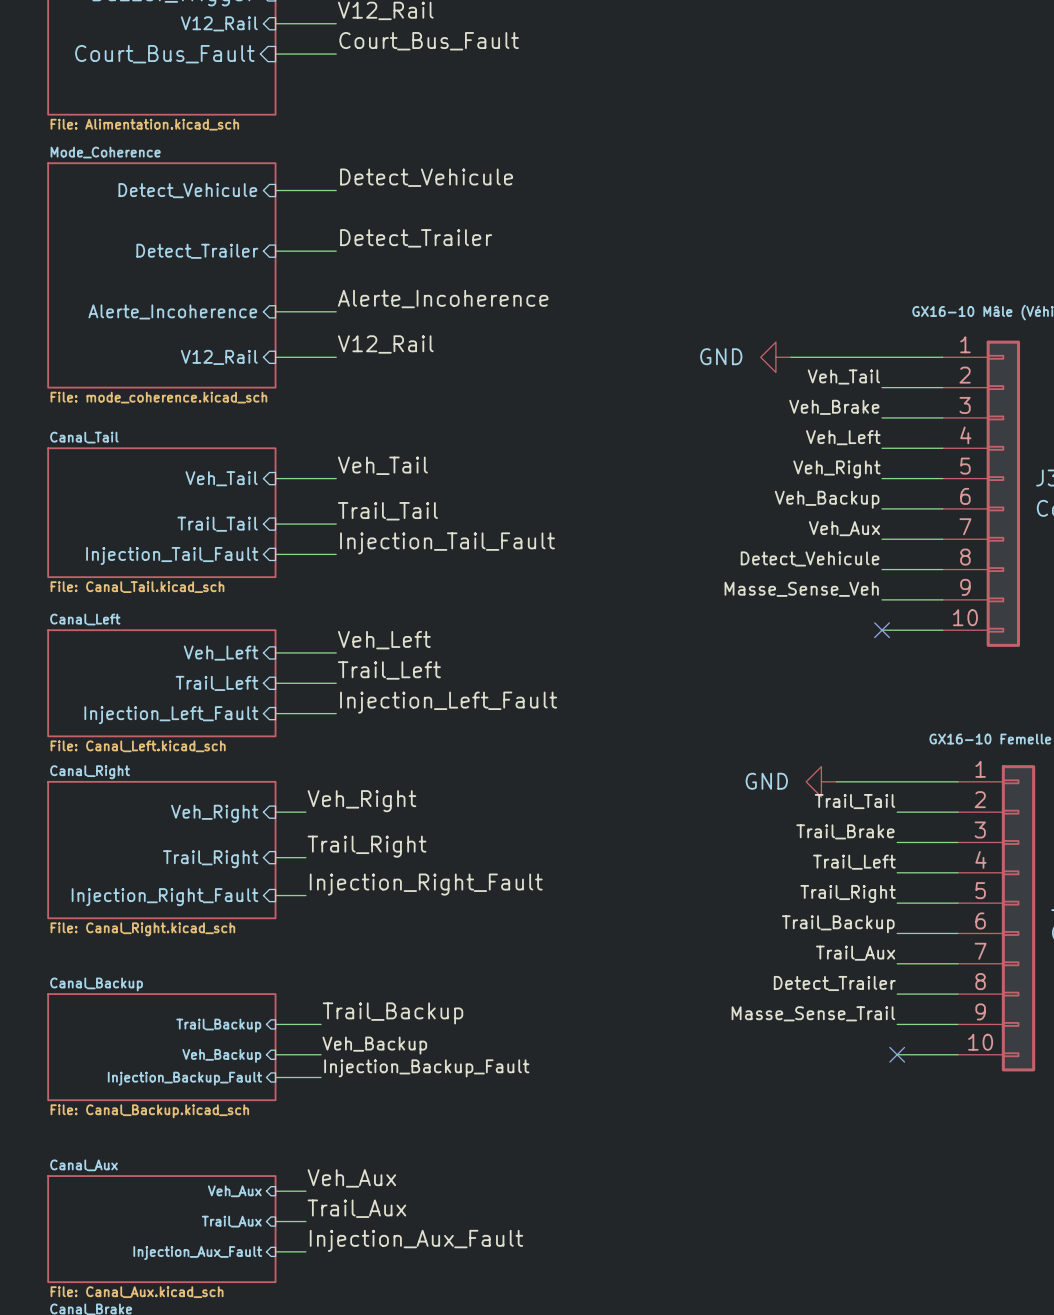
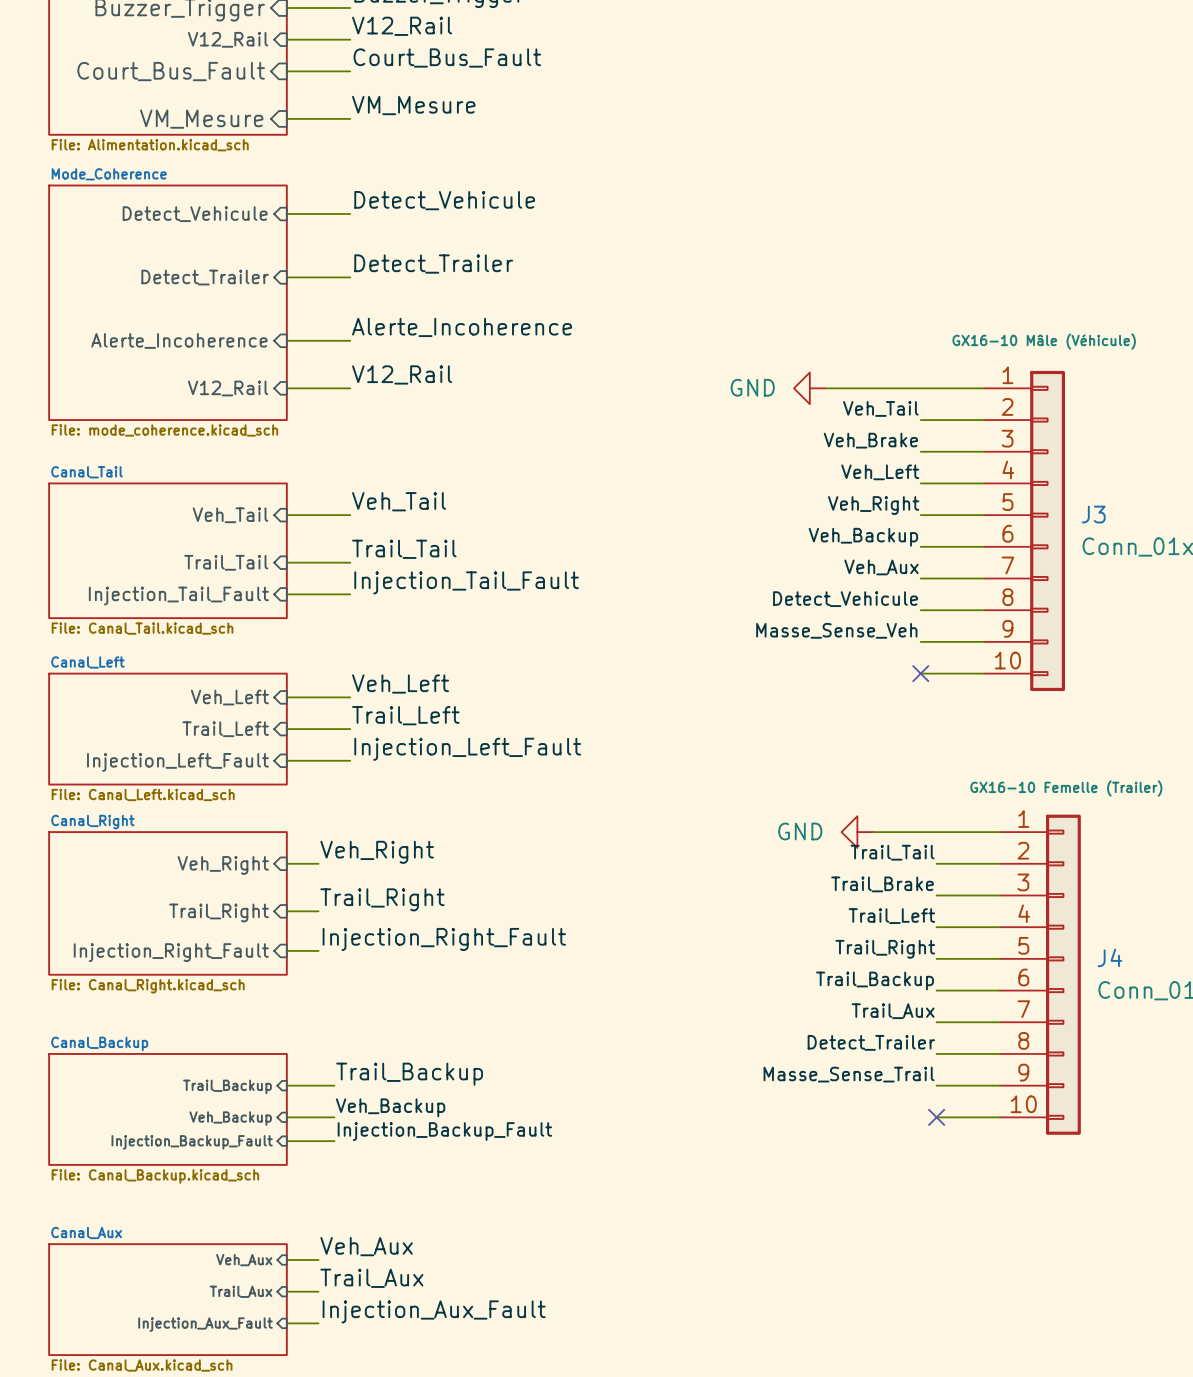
label: none -> VM_Mesure (413, 105)
sheet pin: none -> VM_Mesure (201, 119)
wire: none -> (286, 118) (350, 118)

